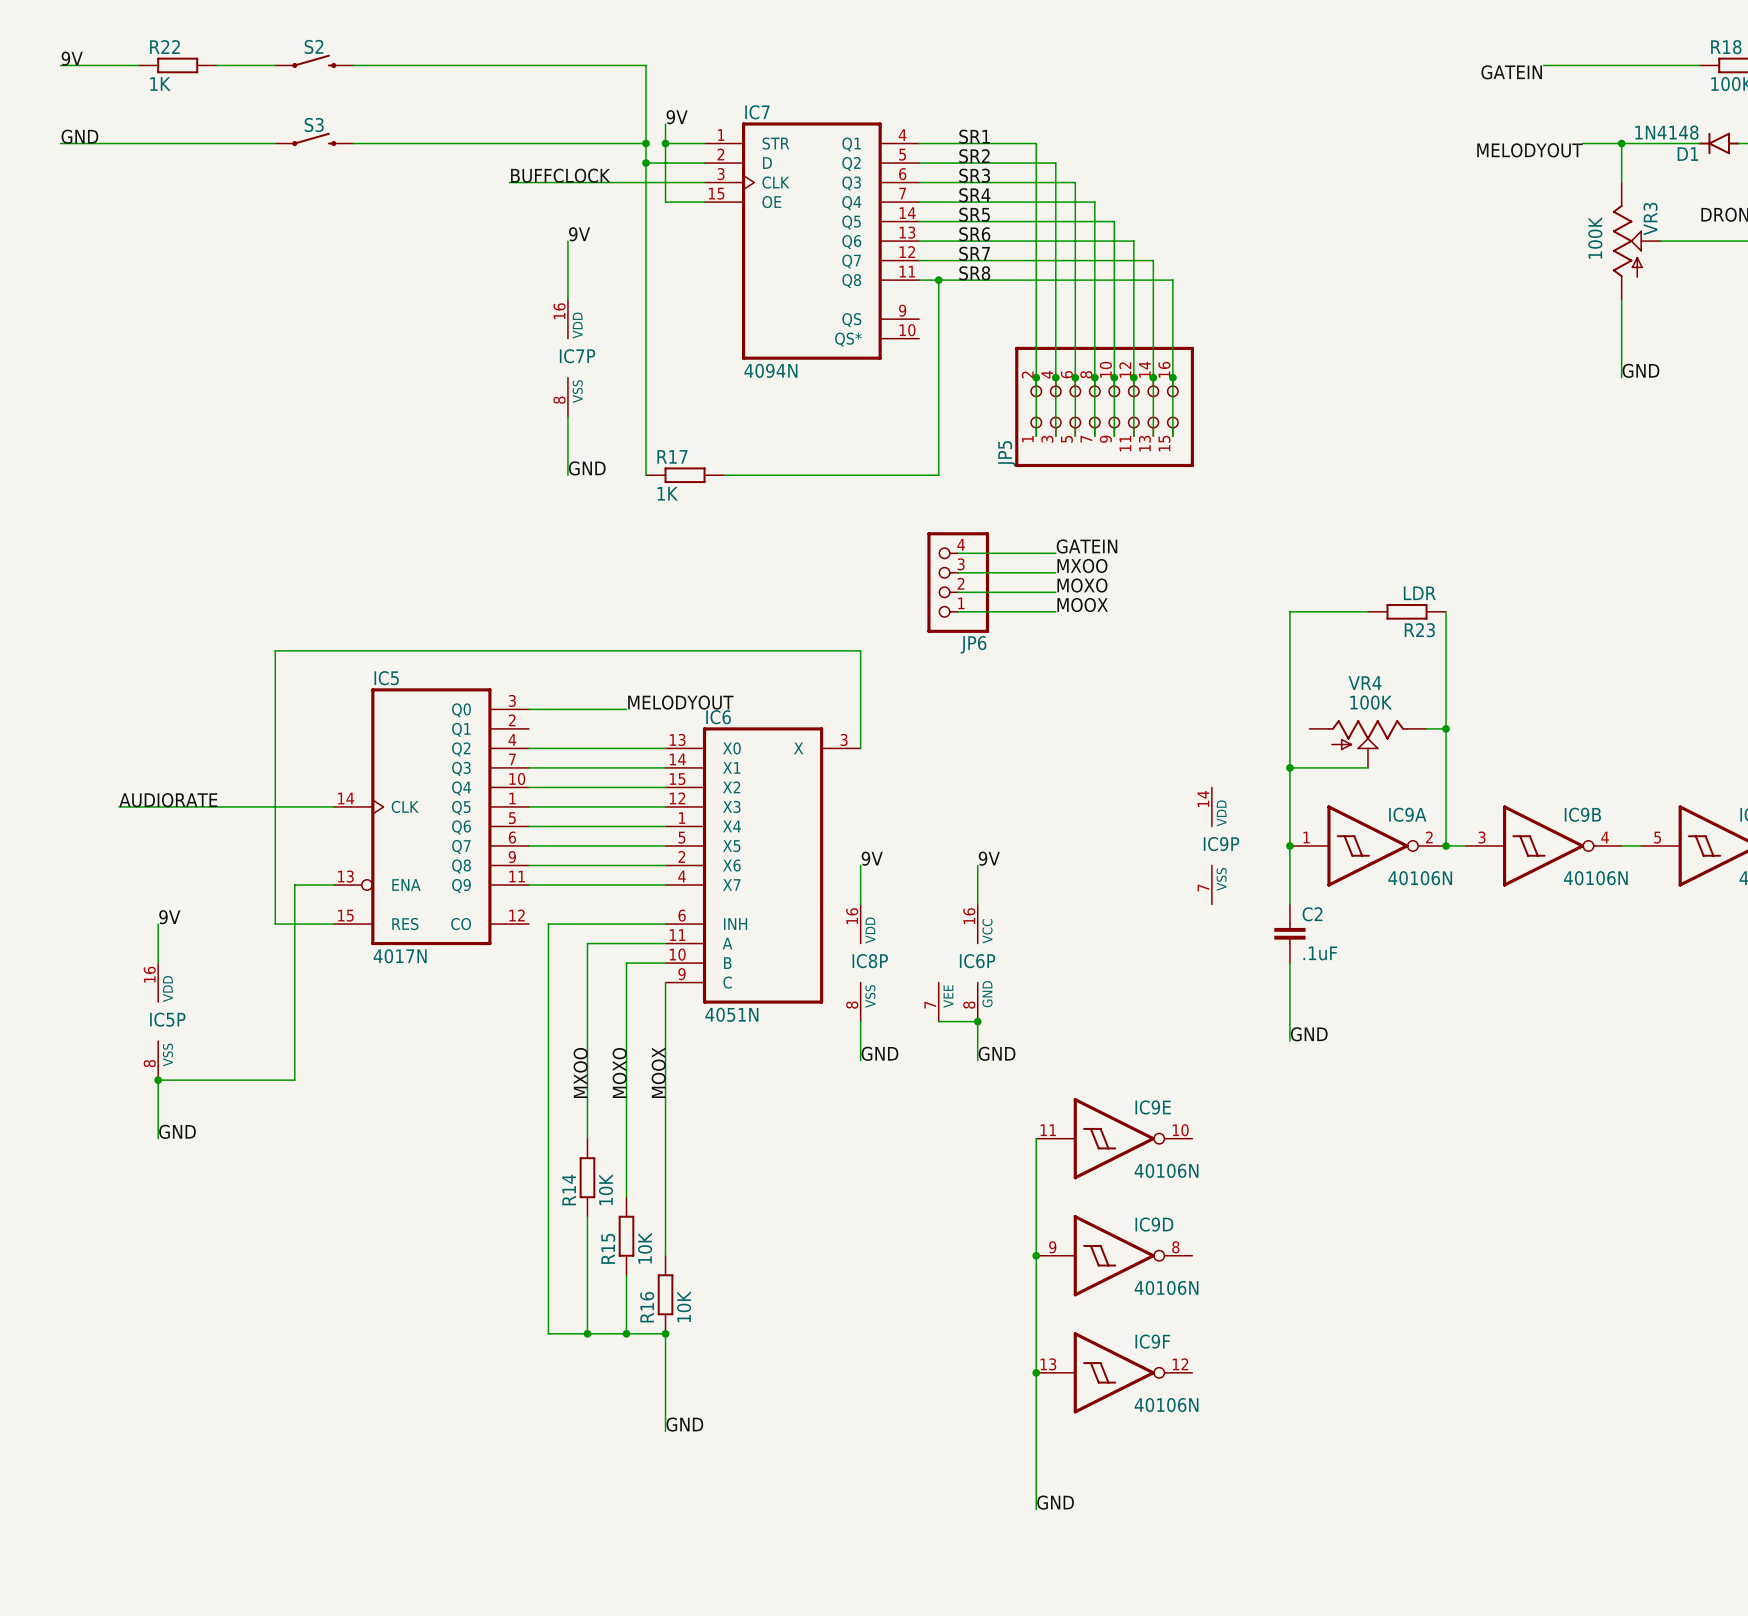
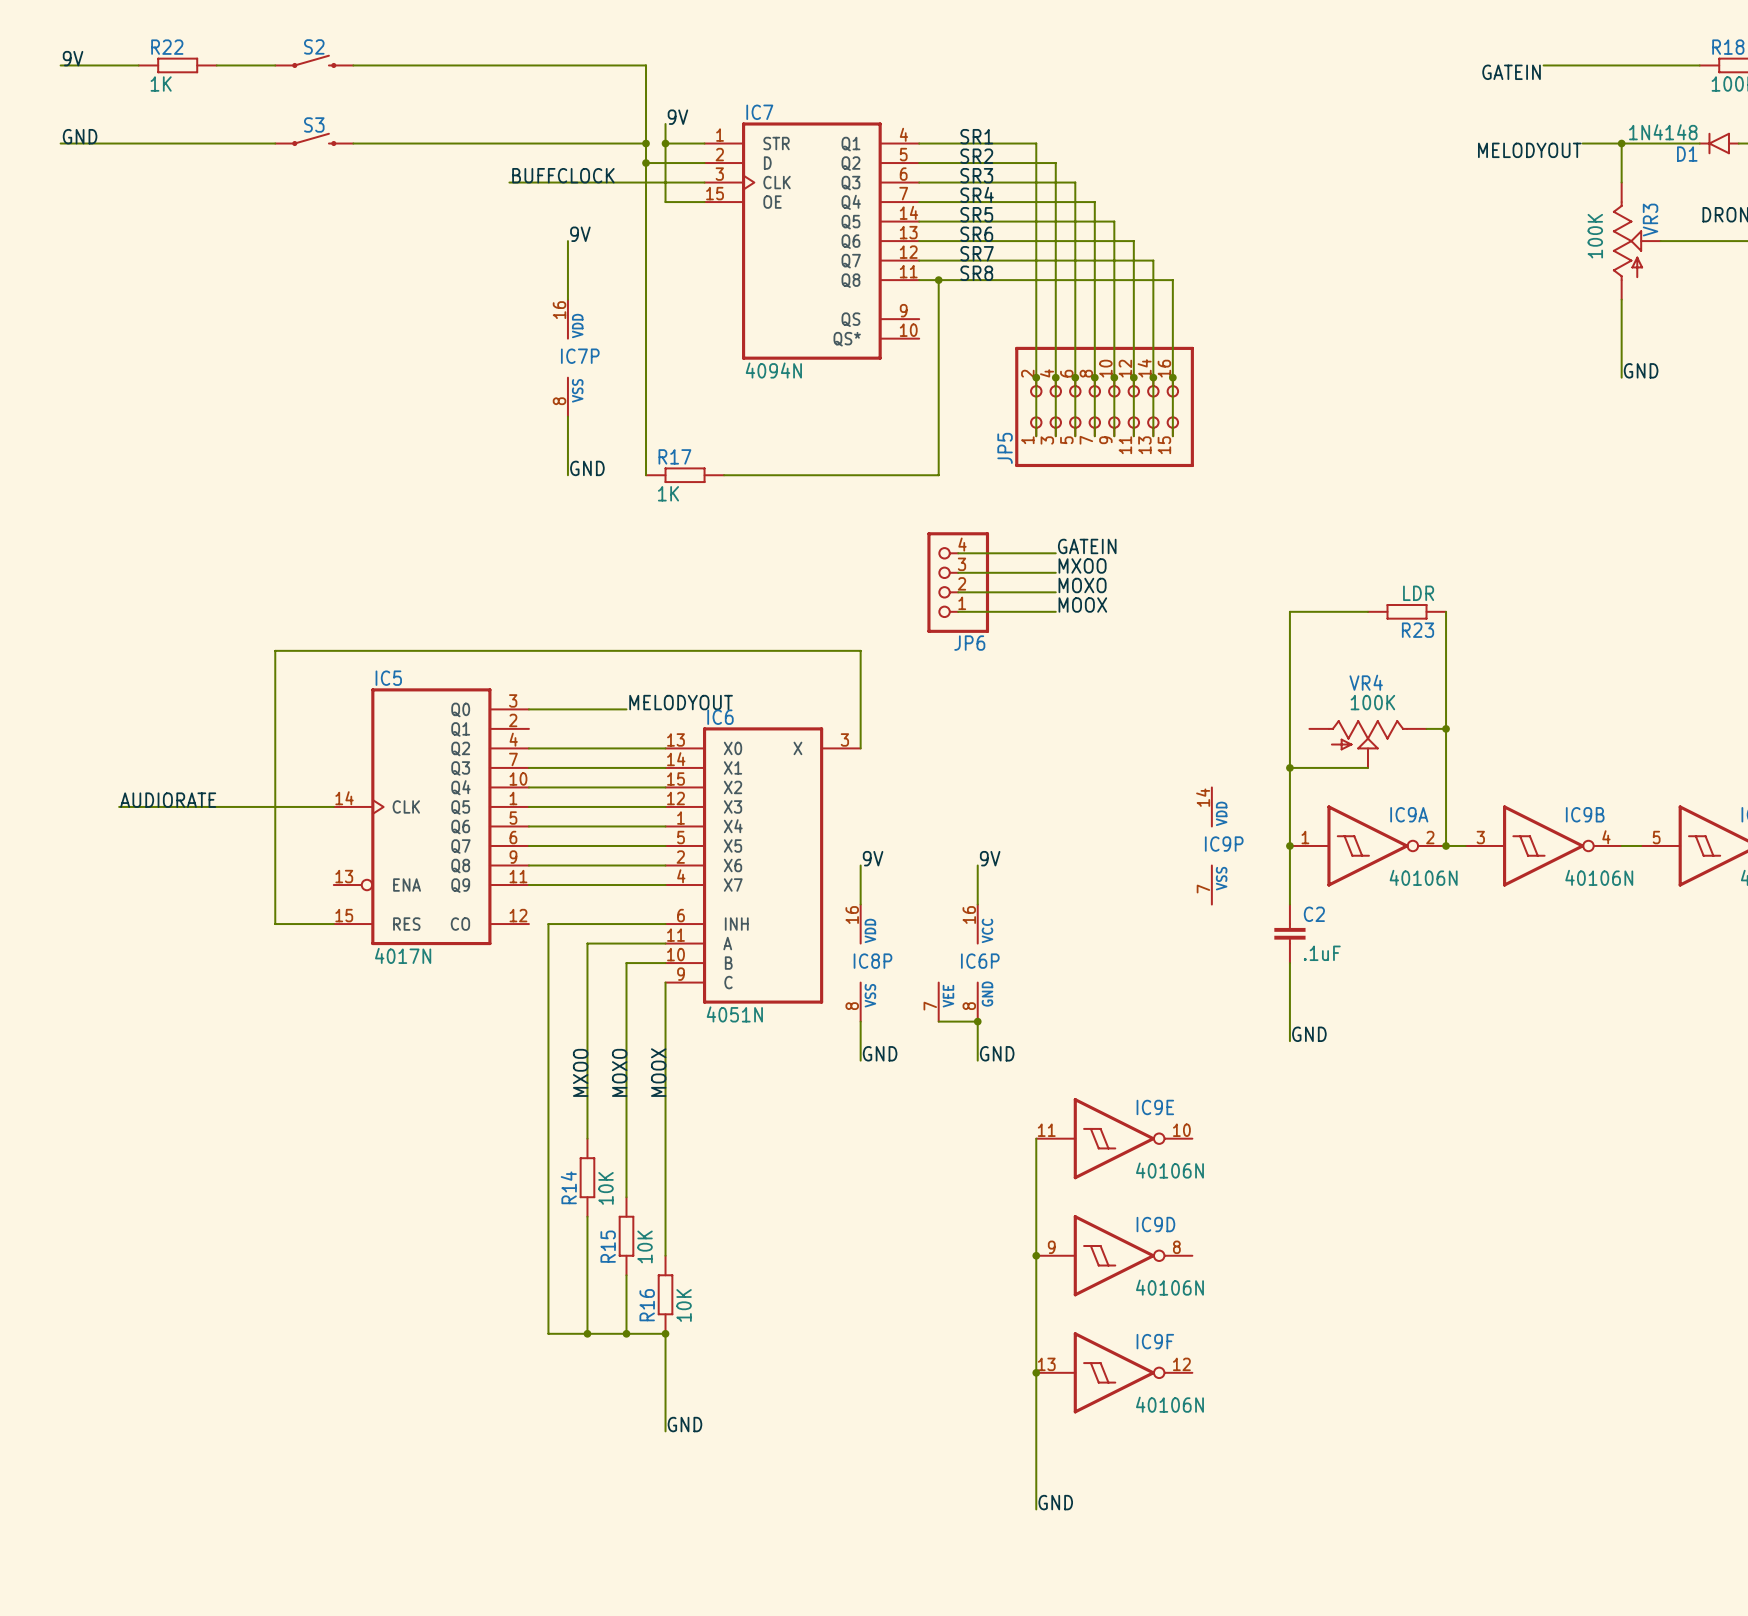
wire: (333, 885) (294, 885) (294, 1080) (158, 1080) (158, 1138) -> none
label: 9V (169, 917) -> none
wire: (158, 924) (158, 963) -> none
IC5P: (158, 1021) -> none
junction: (158, 1080) -> none
label: GND (177, 1131) -> none

